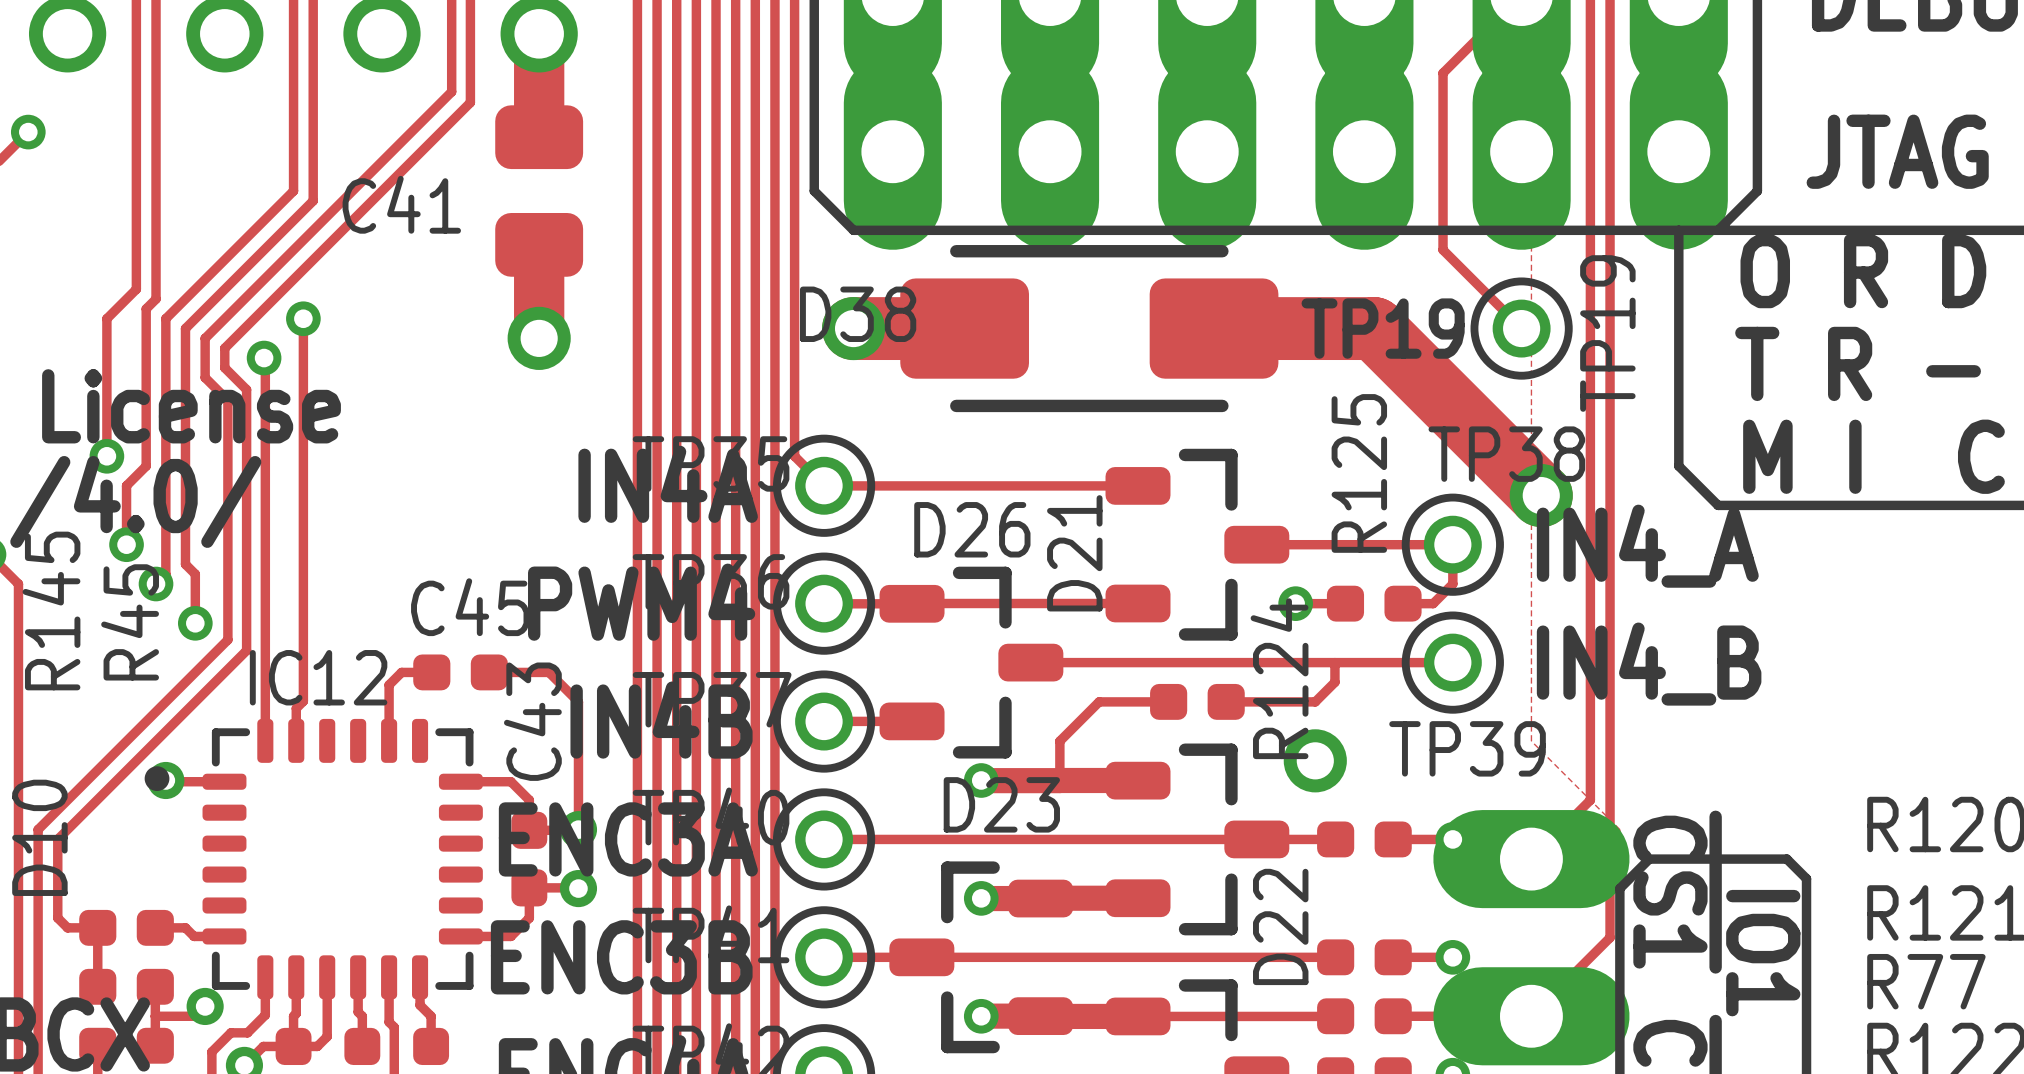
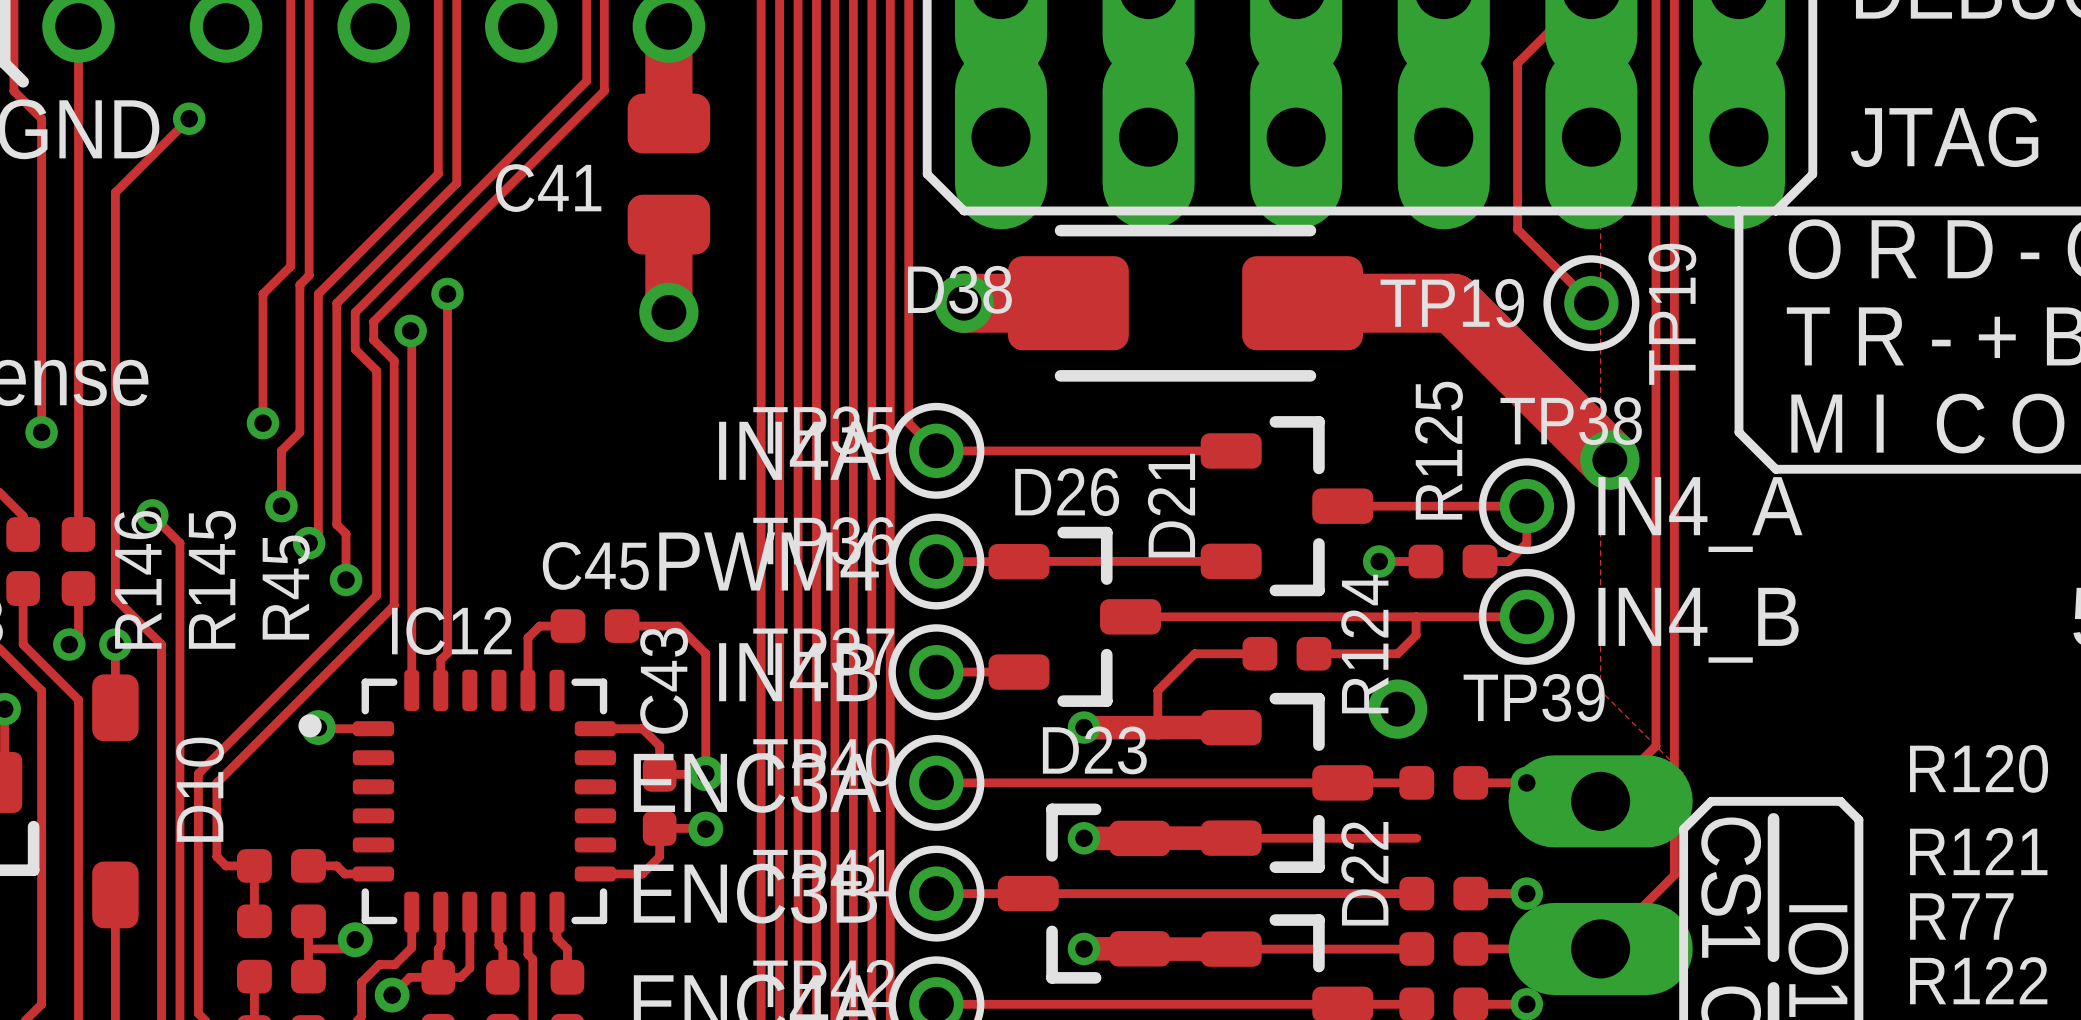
track: none -> (1231, 838) (1416, 838)

